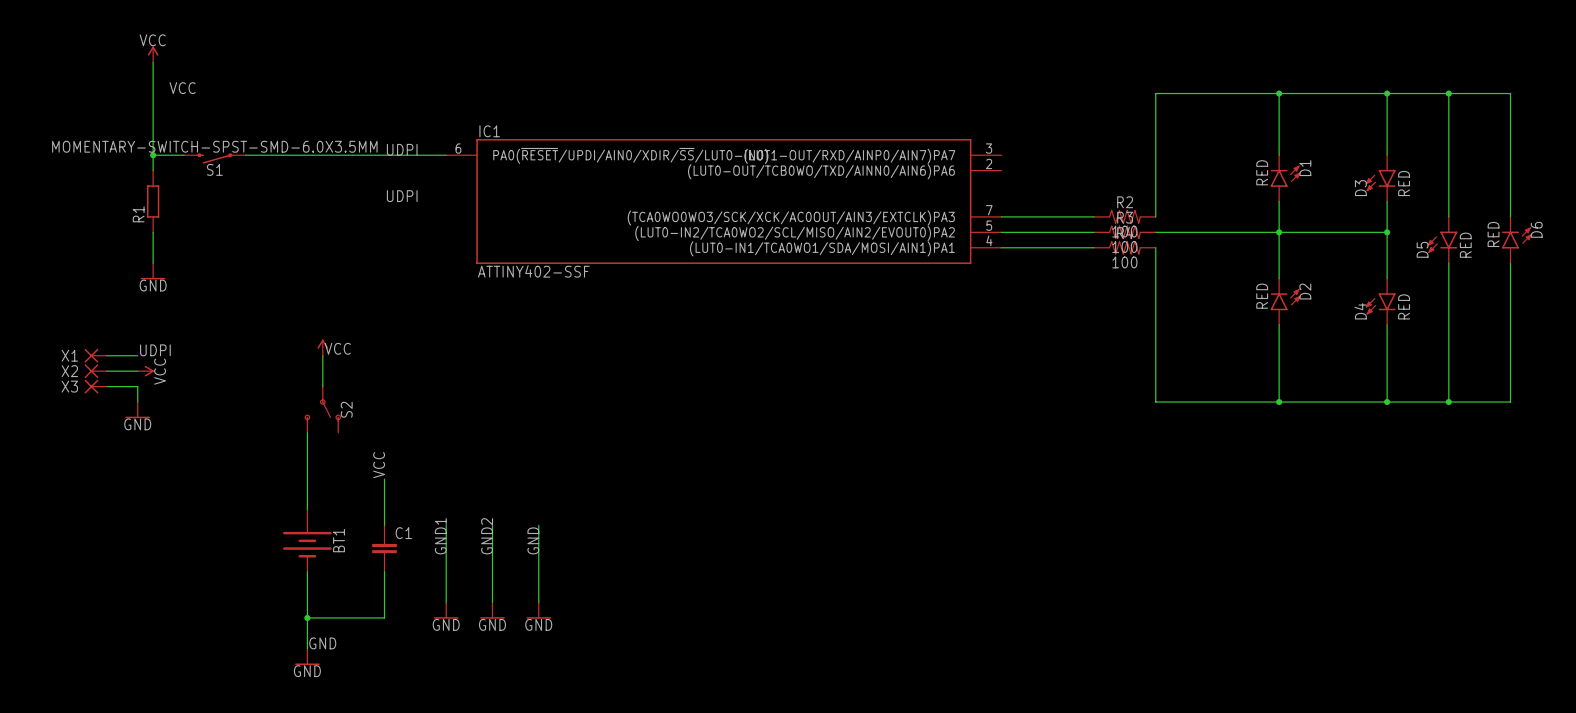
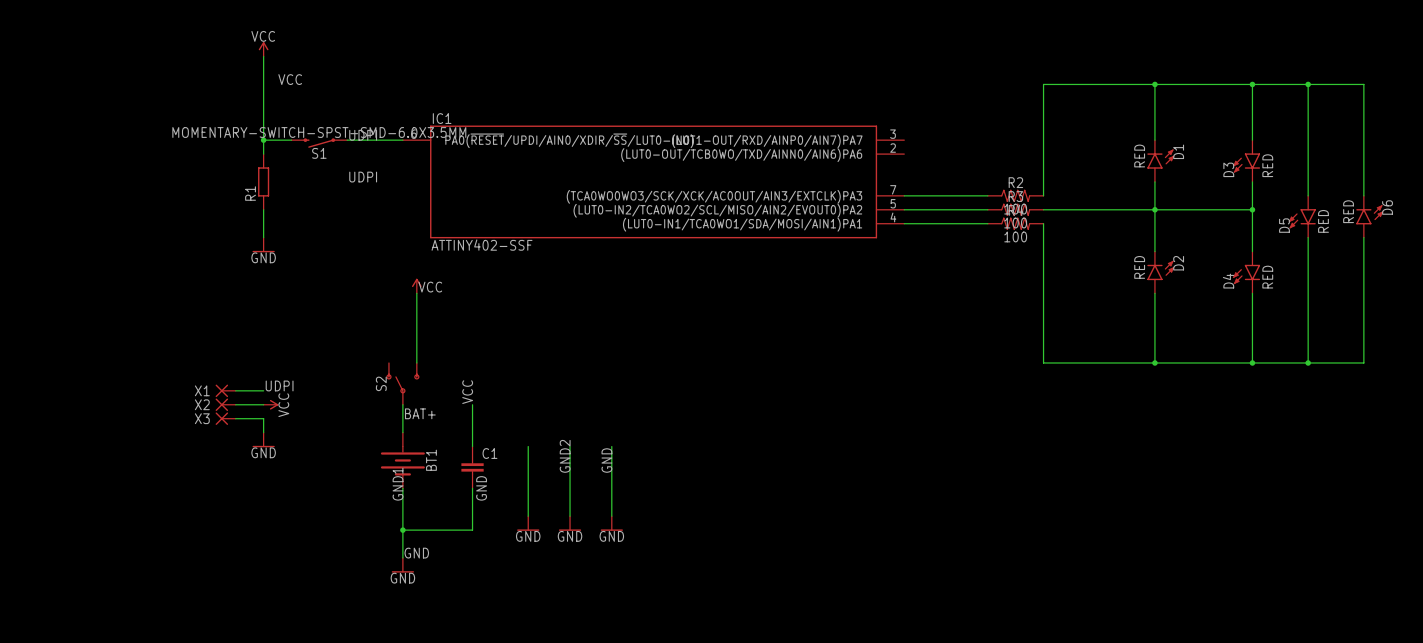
power symbol position: VCC (153, 54) -> VCC (263, 49)
wire: (153, 62) (153, 170) -> (263, 56) (263, 154)
label position: VCC (182, 88) -> VCC (290, 79)
wire: (153, 155) (183, 155) -> none
junction: (153, 155) -> none
wire: (245, 155) (291, 155) -> none
junction: none -> (263, 140)
S1 position: (214, 158) -> (319, 143)
R1 position: (153, 201) -> (263, 181)
wire: (153, 232) (153, 263) -> (263, 209) (263, 237)
power symbol: GND (153, 271) -> none
power symbol: none -> GND (263, 244)
power symbol: none -> VCC (416, 286)
wire: none -> (416, 293) (416, 362)
power symbol: VCC (322, 347) -> none
label: UDPI (155, 350) -> none
X1 position: (95, 355) -> (225, 390)
wire: (106, 355) (137, 355) -> none
wire: (322, 355) (322, 386) -> none
X2 position: (95, 371) -> (225, 404)
wire: (106, 371) (137, 371) -> none
power symbol: VCC (145, 371) -> none
X3 position: (95, 386) -> (225, 418)
wire: (106, 386) (137, 386) (137, 402) -> none
S2 position: (322, 409) -> (402, 383)
power symbol: GND (137, 410) -> none
S2 rotation: 0° (322, 410) -> 180° (402, 383)
label: none -> UDPI (279, 385)
wire: none -> (235, 390) (263, 390)
wire: (307, 432) (307, 509) -> none
wire: none -> (235, 404) (263, 404)
power symbol: none -> VCC (270, 404)
wire: none -> (402, 404) (402, 432)
label: none -> BAT+ (420, 413)
wire: none -> (235, 418) (263, 418) (263, 432)
label position: VCC (379, 465) -> VCC (467, 392)
wire: (384, 479) (384, 525) -> (472, 404) (472, 446)
power symbol: none -> GND (263, 439)
wire: none -> (528, 446) (528, 516)
label: none -> GND (606, 460)
wire: (492, 525) (492, 602) -> (570, 446) (570, 516)
wire: (538, 525) (538, 602) -> (611, 446) (611, 516)
label position: GND2 (487, 536) -> GND2 (565, 456)
BT1 position: (307, 540) -> (402, 460)
C1 position: (384, 548) -> (472, 467)
wire: (307, 571) (307, 648) -> none
wire: (384, 571) (384, 617) (307, 617) -> (472, 488) (472, 530) (402, 530)
power symbol: none -> GND (528, 523)
power symbol: none -> GND (570, 523)
power symbol: none -> GND (611, 523)
junction: none -> (402, 530)
power symbol position: GND (446, 610) -> GND (402, 565)
power symbol: GND (492, 610) -> none
power symbol: GND (538, 610) -> none
junction: (307, 617) -> none
label position: GND (322, 643) -> GND (416, 553)
power symbol: GND (307, 656) -> none

